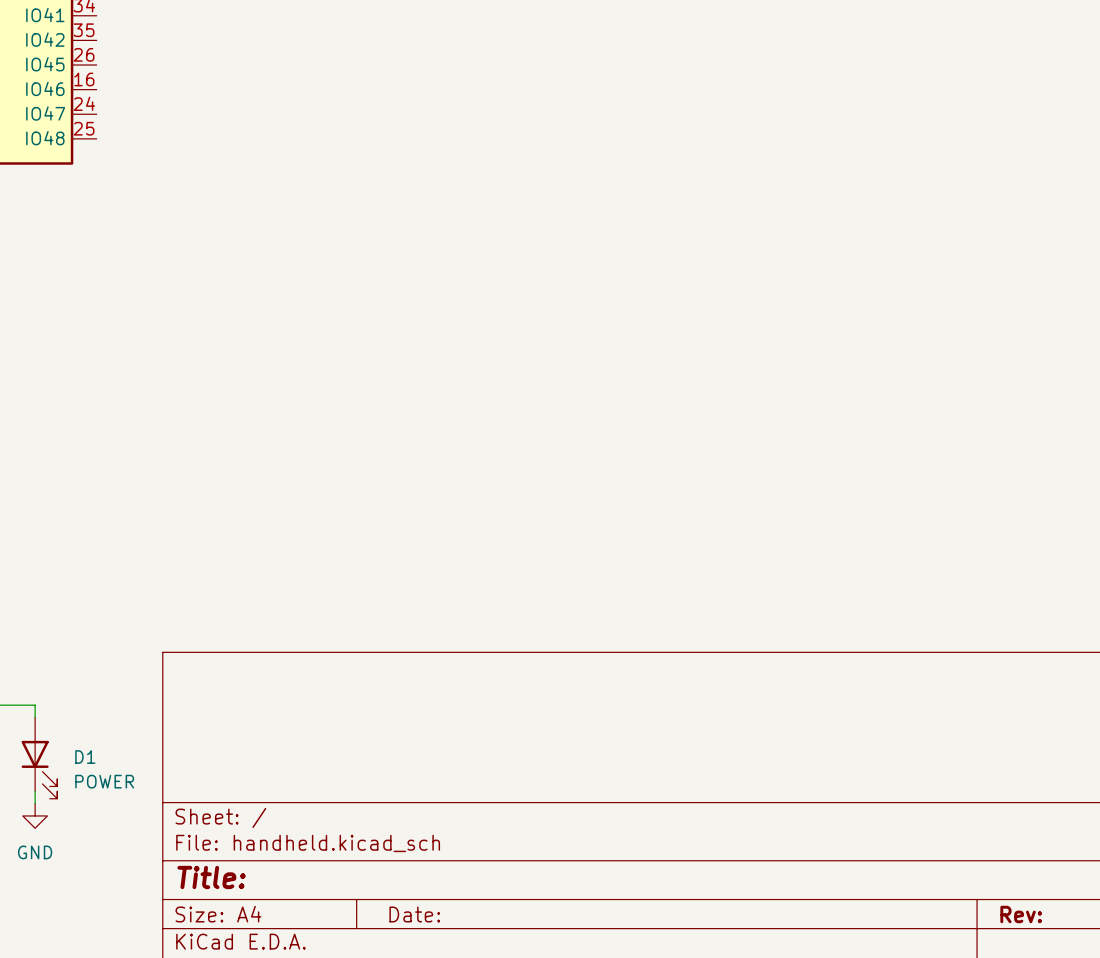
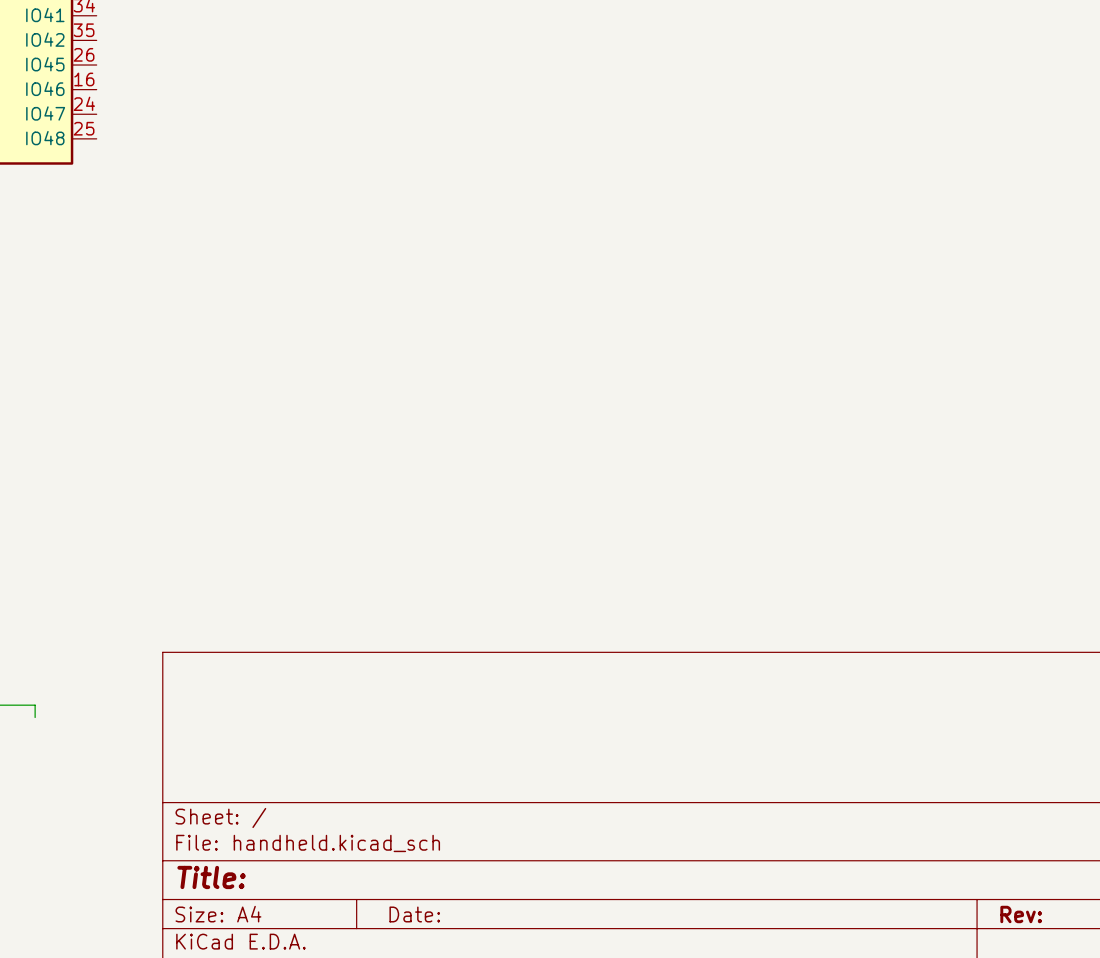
D1: POWER (39, 758) -> none
wire: (35, 791) (35, 803) -> none
power symbol: GND (35, 815) -> none

